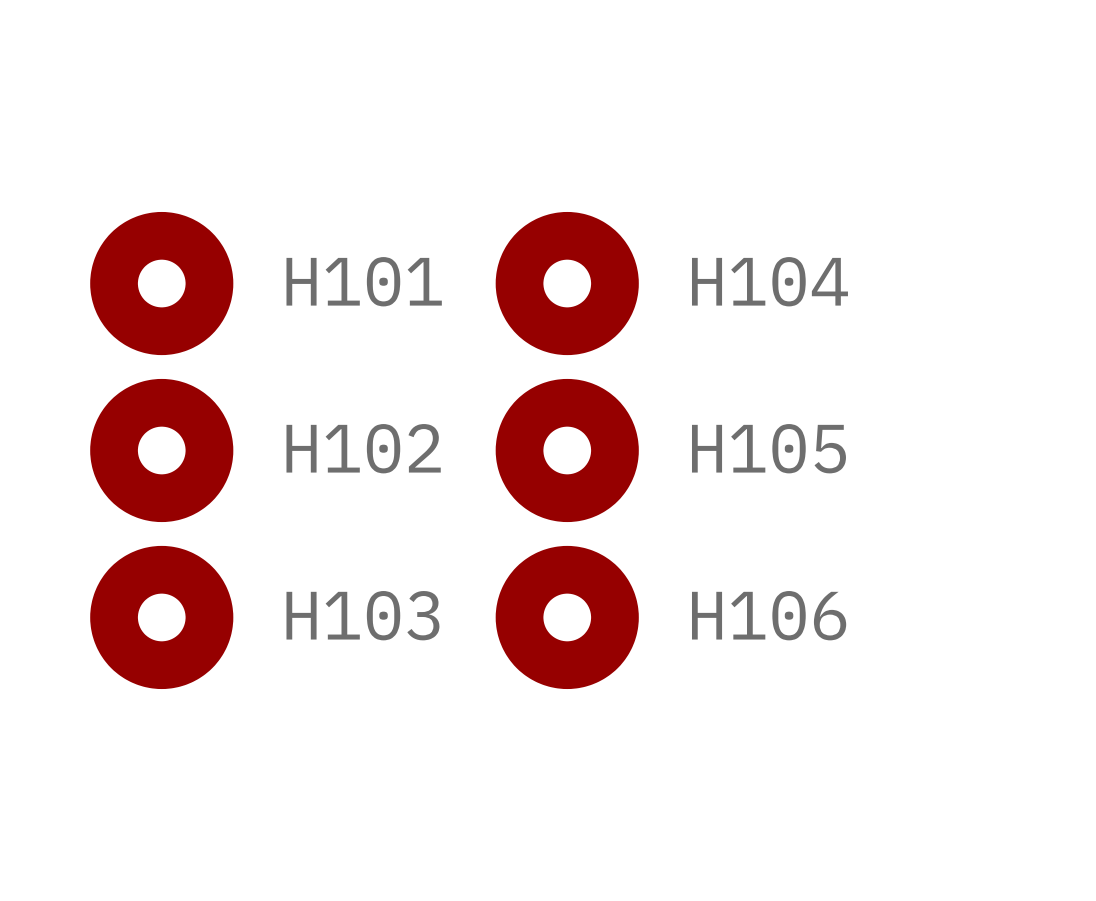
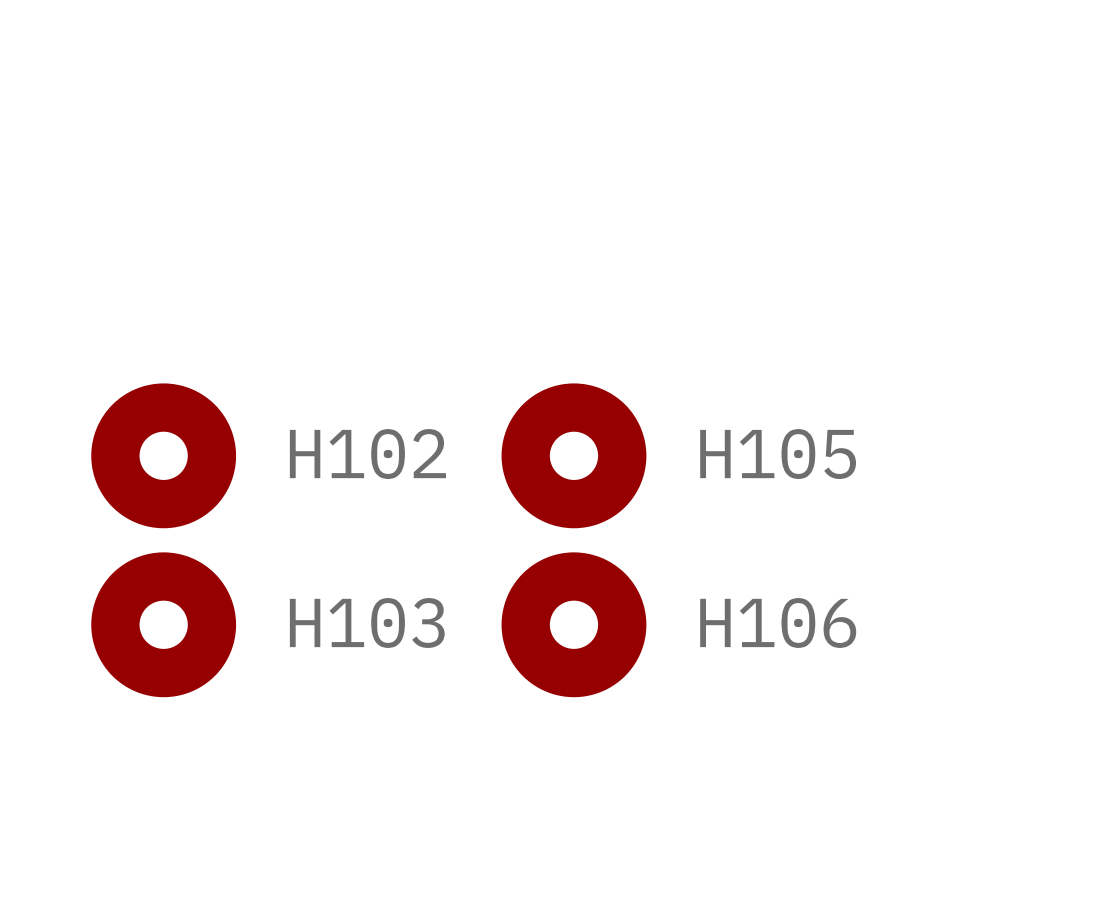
H101: (161, 283) -> none
H104: (567, 283) -> none

